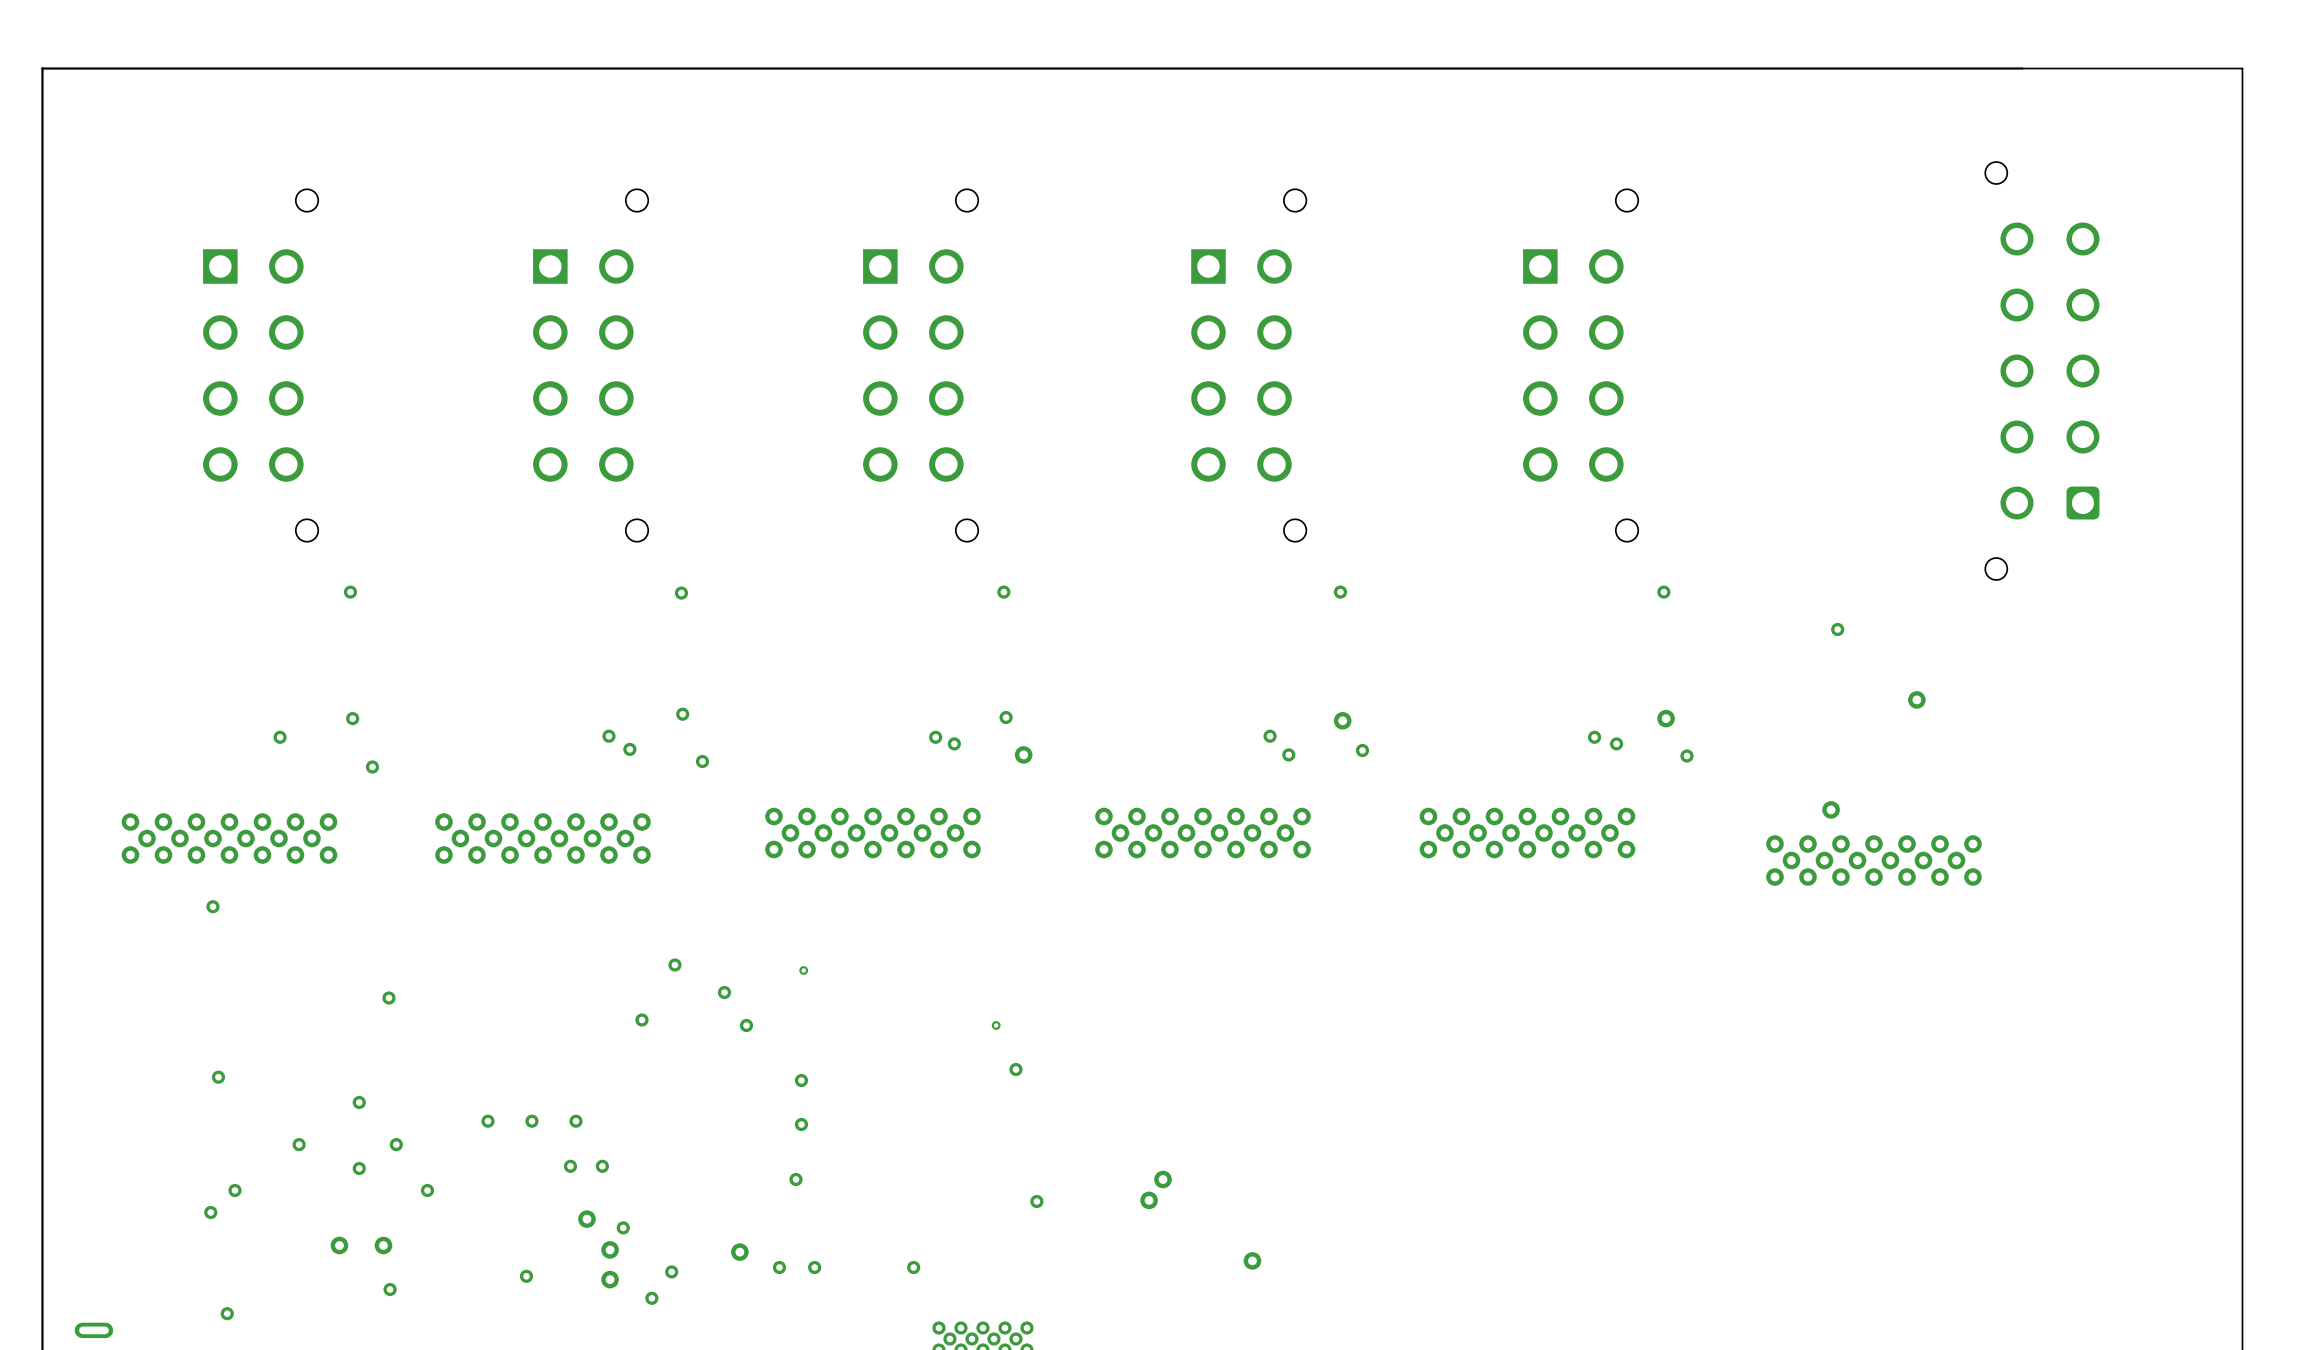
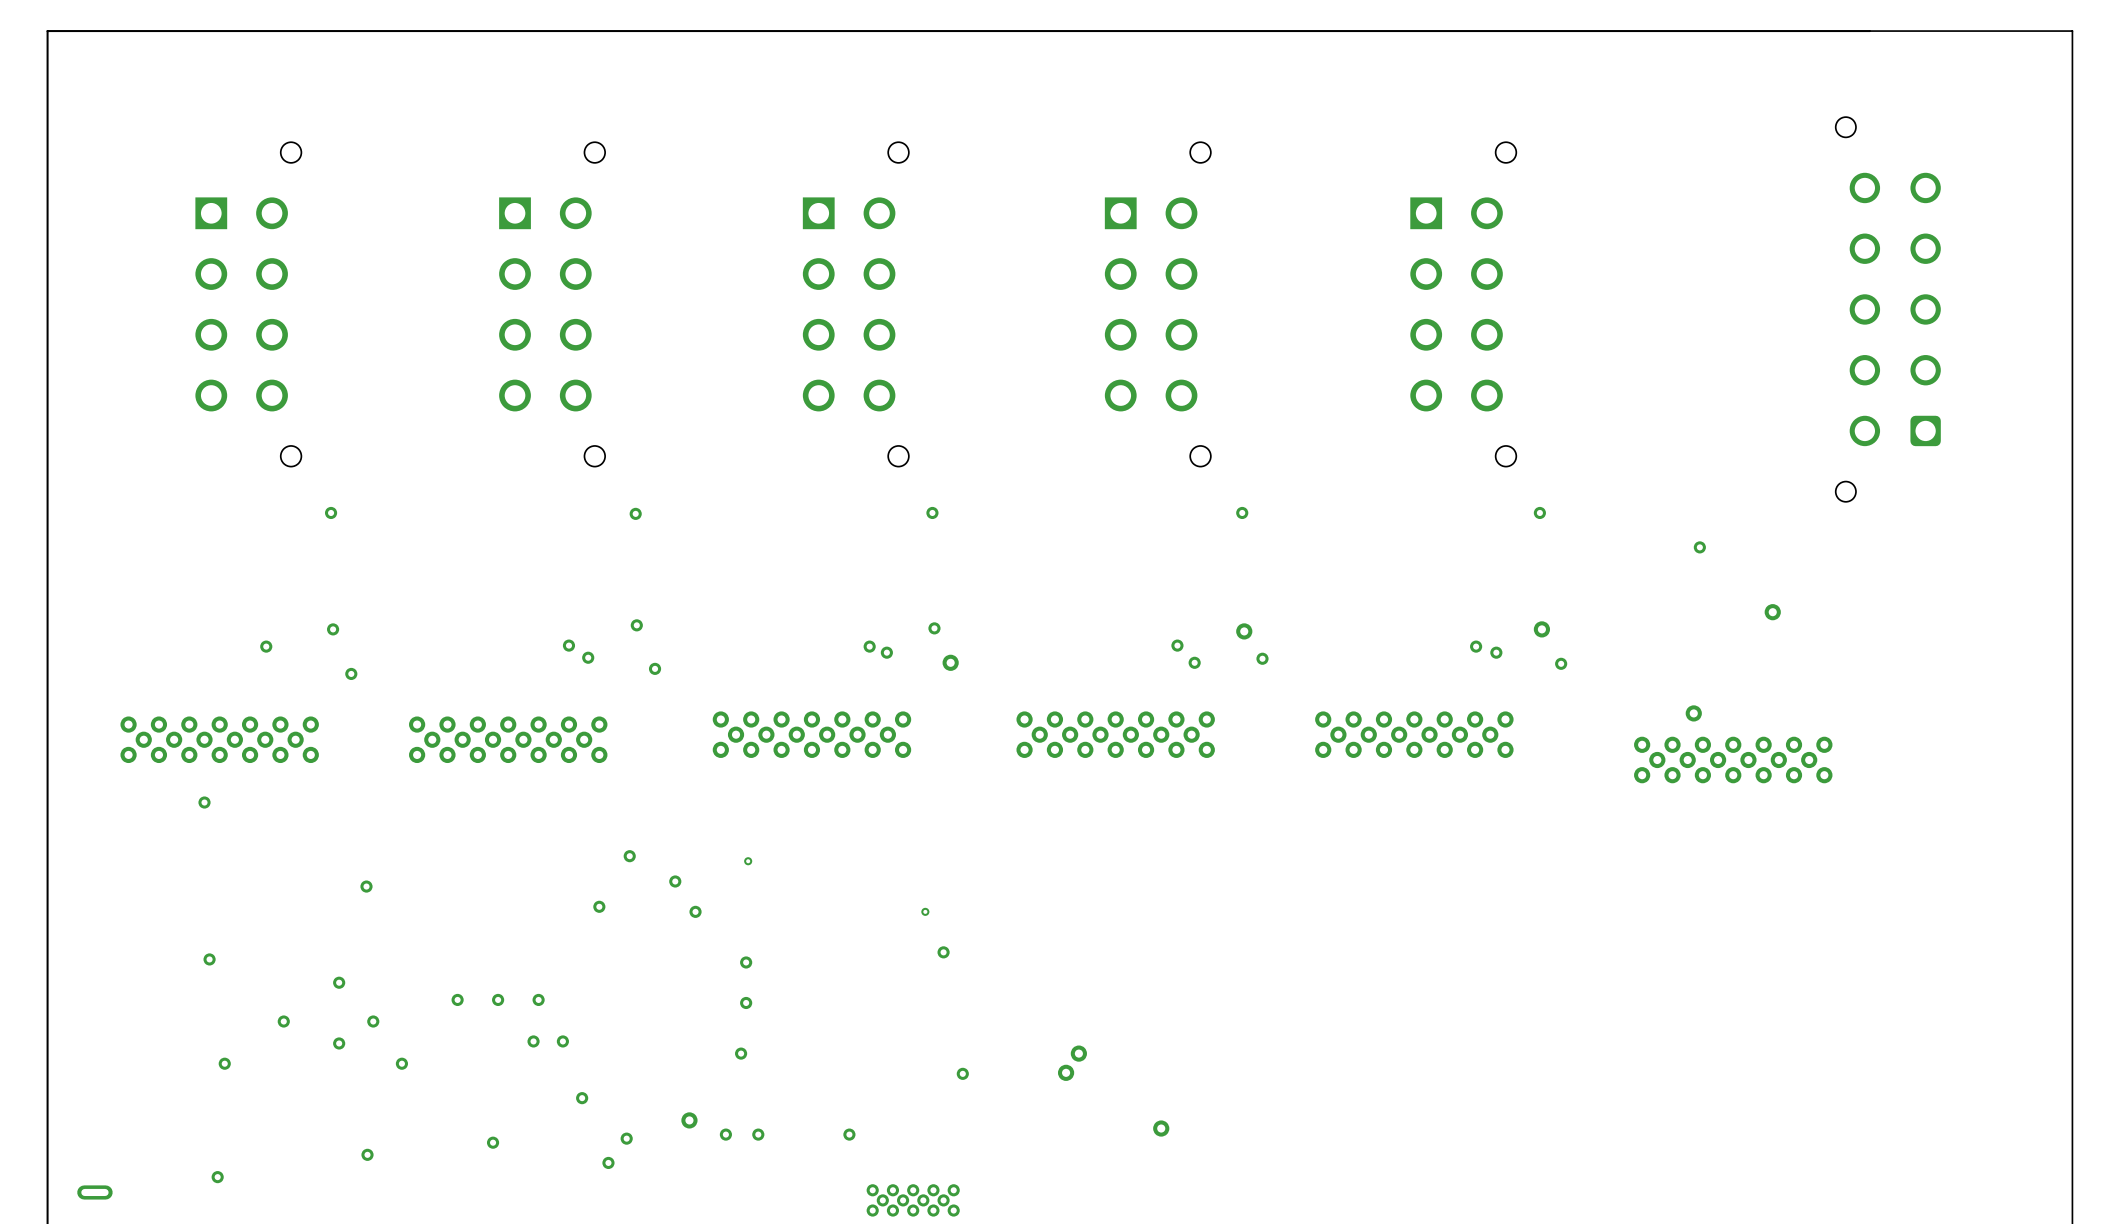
via: (210, 1212) -> none
via: (586, 1219) -> none
via: (339, 1245) -> none
via: (383, 1245) -> none
via: (610, 1249) -> none
via: (610, 1279) -> none

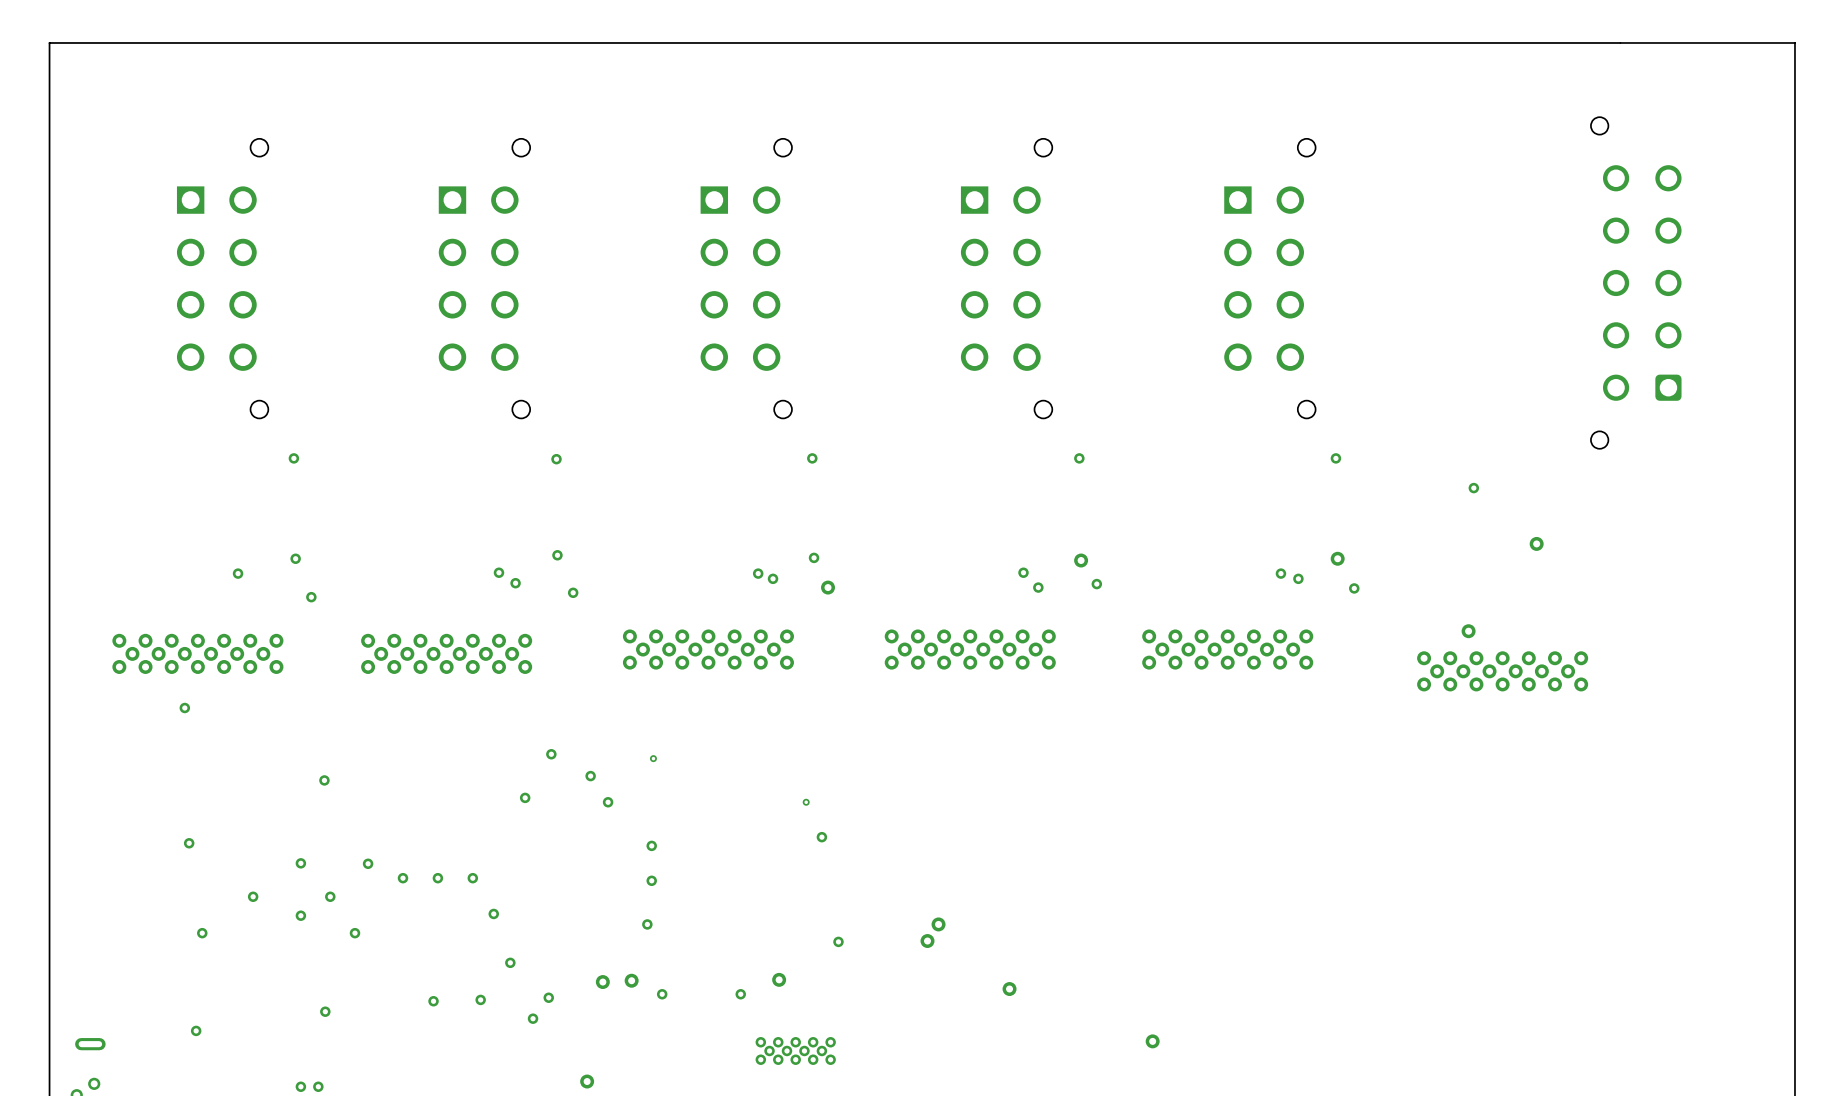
via: none -> (368, 863)
via: (533, 1041) -> none
via: none -> (779, 979)
via: none -> (631, 980)
via: (725, 1134) -> none
via: none -> (480, 999)
via: none -> (1152, 1041)

